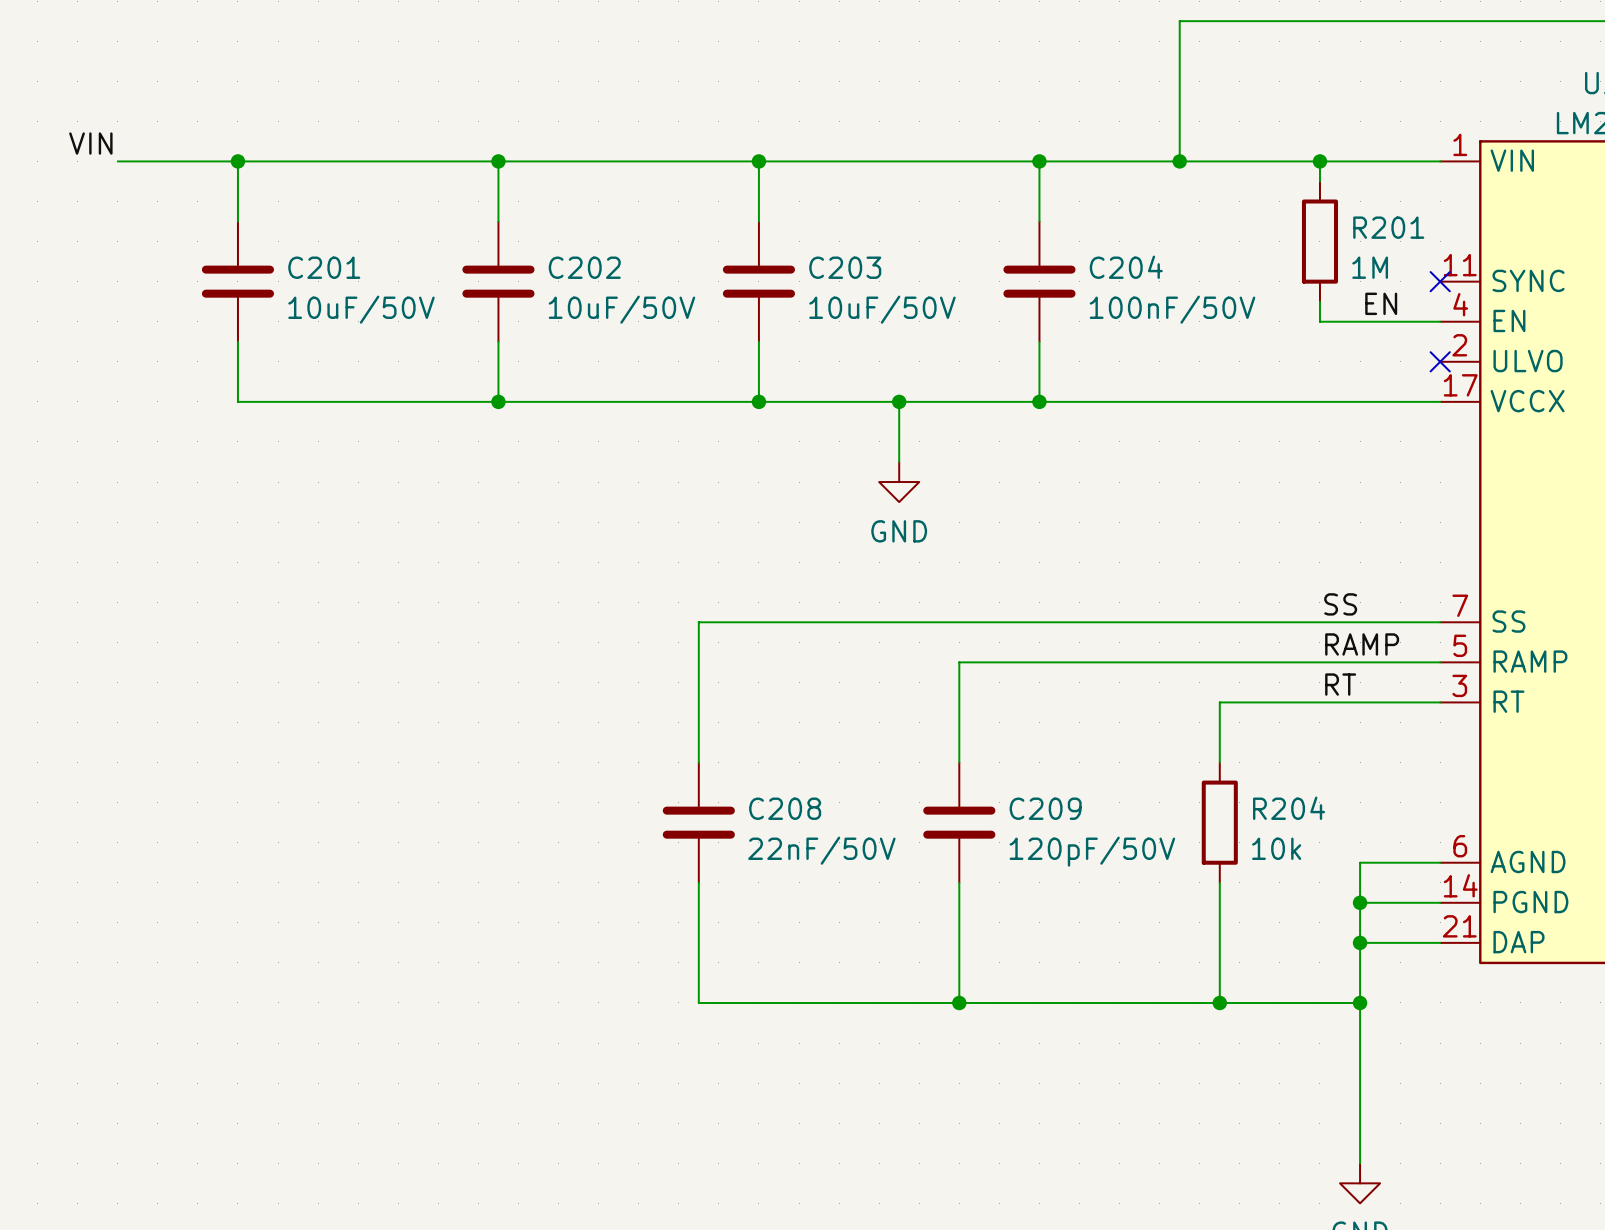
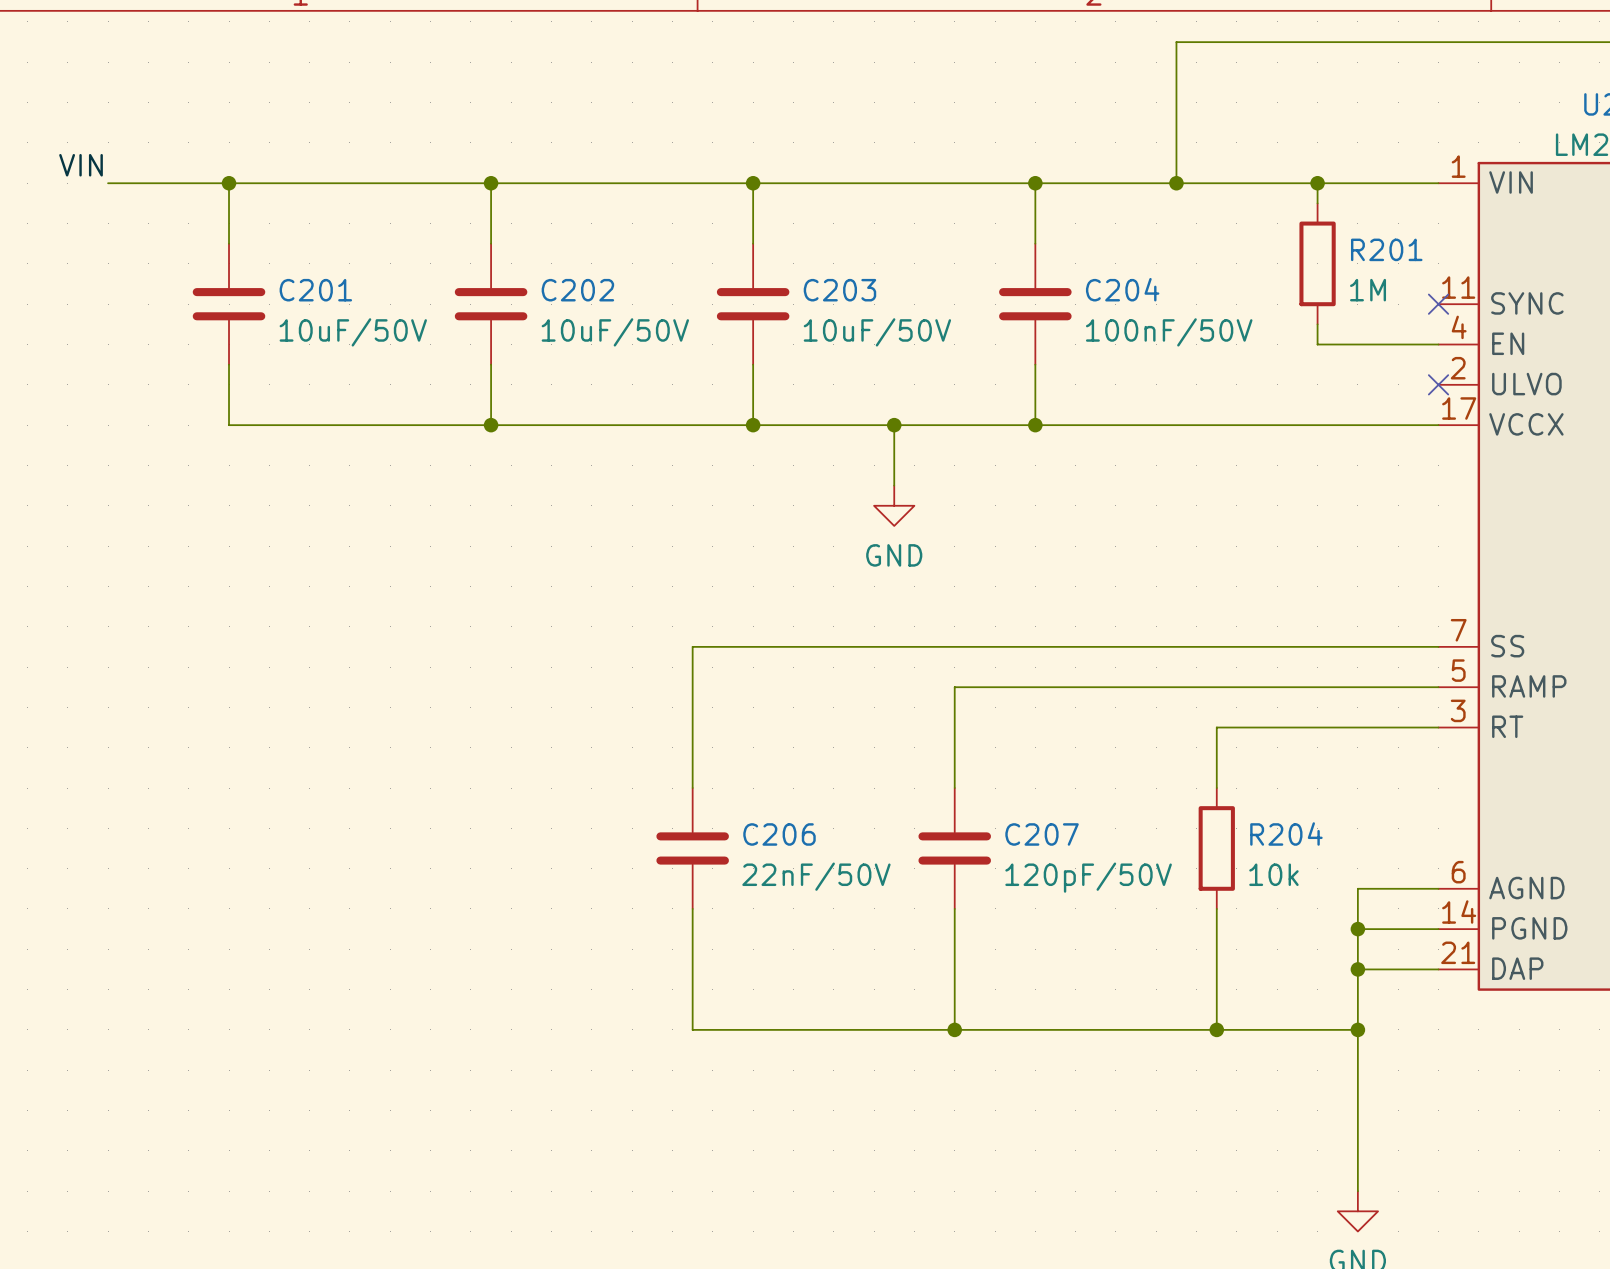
label: EN (1381, 303) -> none
label: SS (1340, 604) -> none
label: RAMP (1362, 644) -> none
label: RT (1340, 684) -> none
C208 name: C208 (785, 808) -> C206 (779, 834)
C209 name: C209 (1045, 808) -> C207 (1042, 834)

